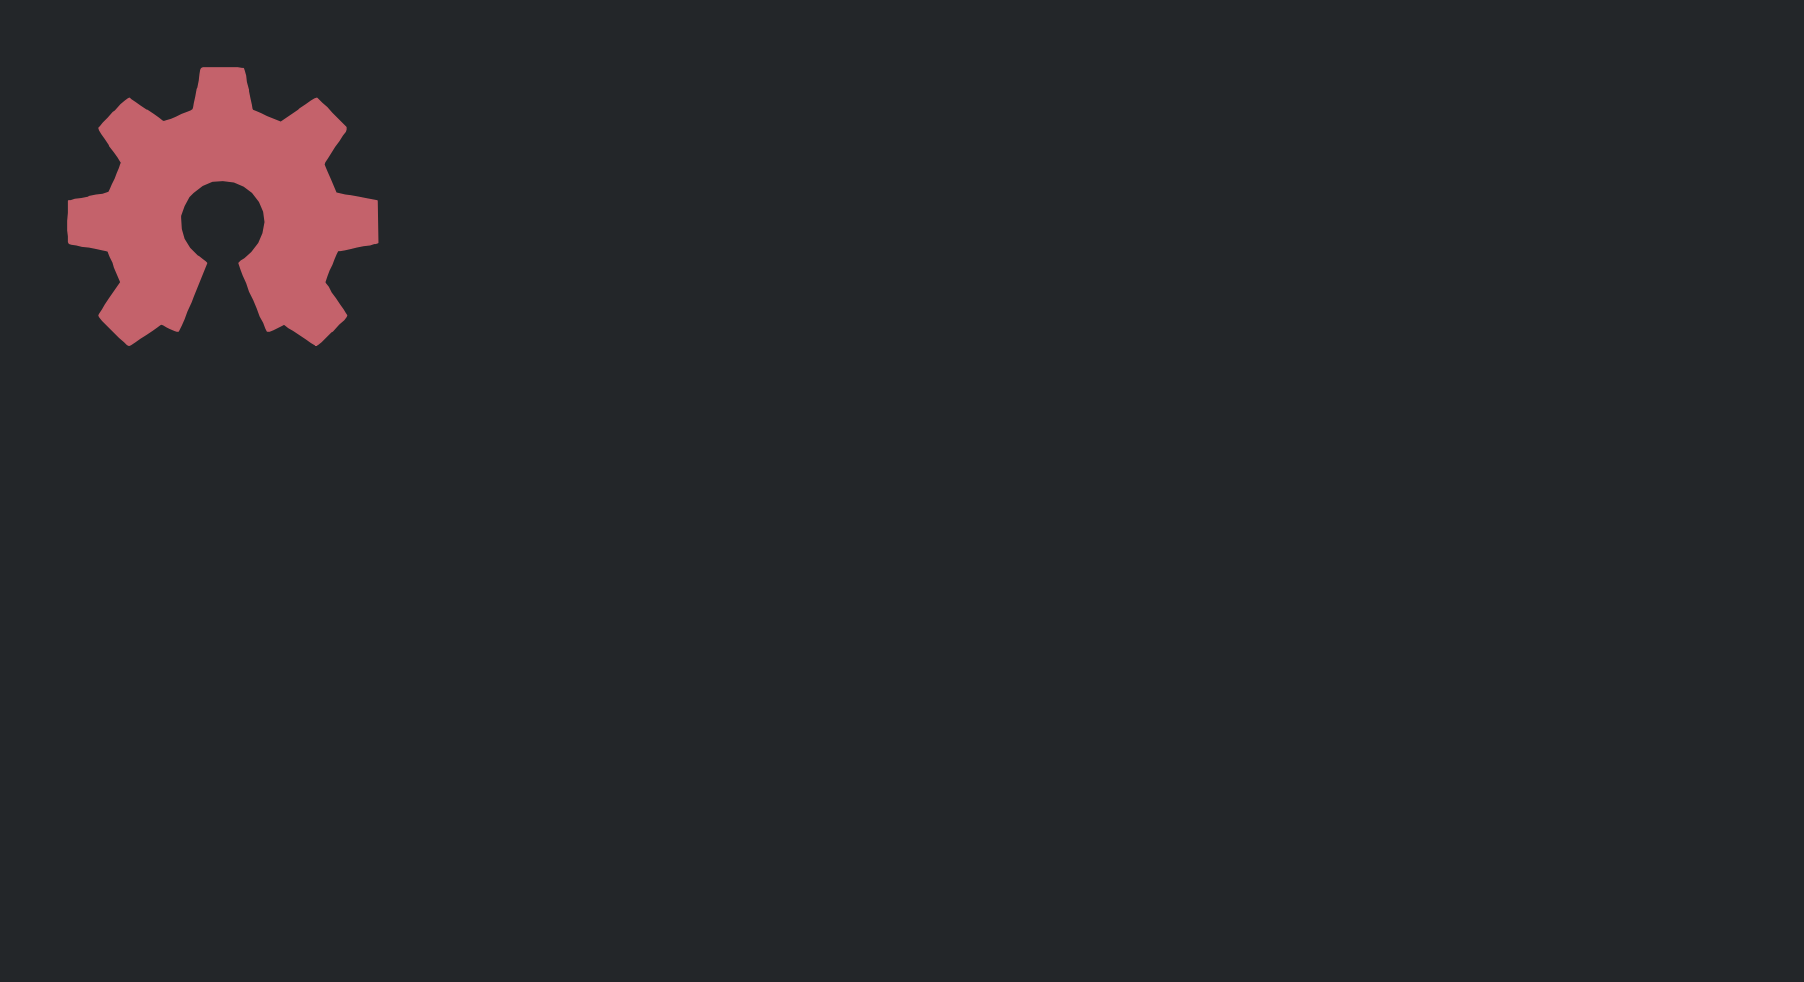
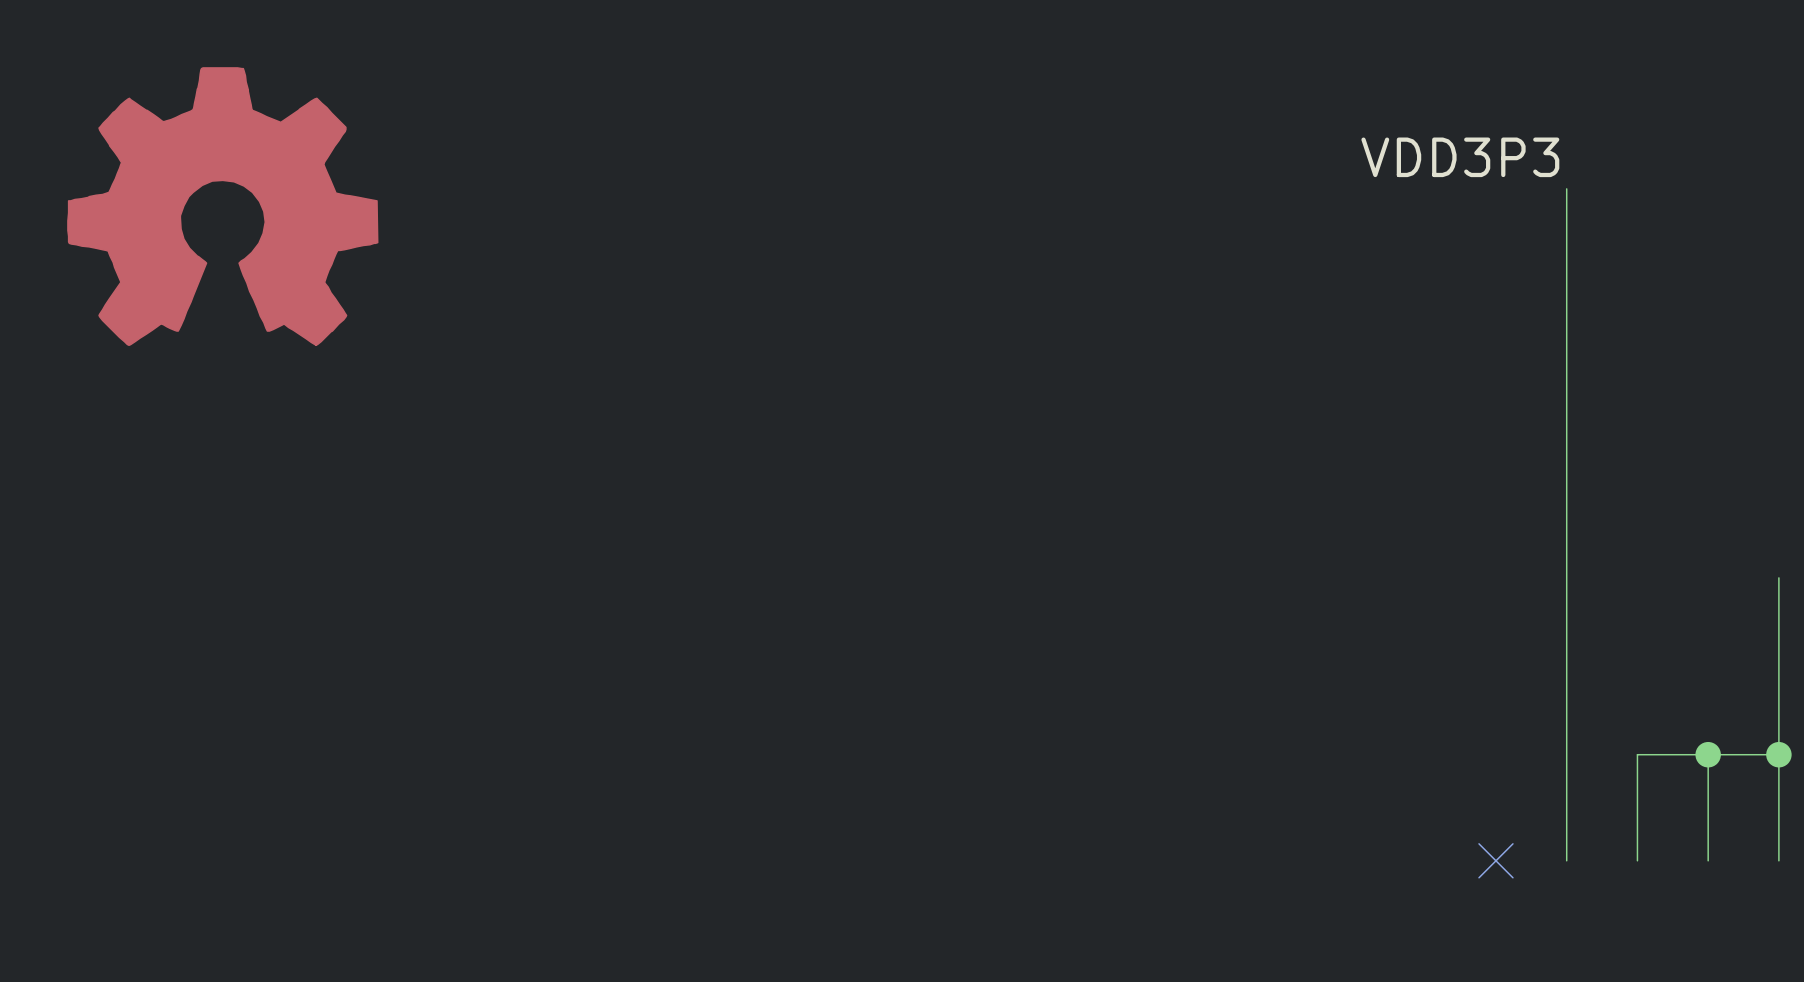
label: none -> VDD3P3 (1460, 157)
wire: none -> (1566, 188) (1566, 860)
wire: none -> (1778, 577) (1778, 860)
wire: none -> (1708, 754) (1708, 860)
junction: none -> (1708, 754)
wire: none -> (1778, 754) (1637, 754) (1637, 860)
junction: none -> (1778, 754)
no-connect mark: none -> (1495, 860)

